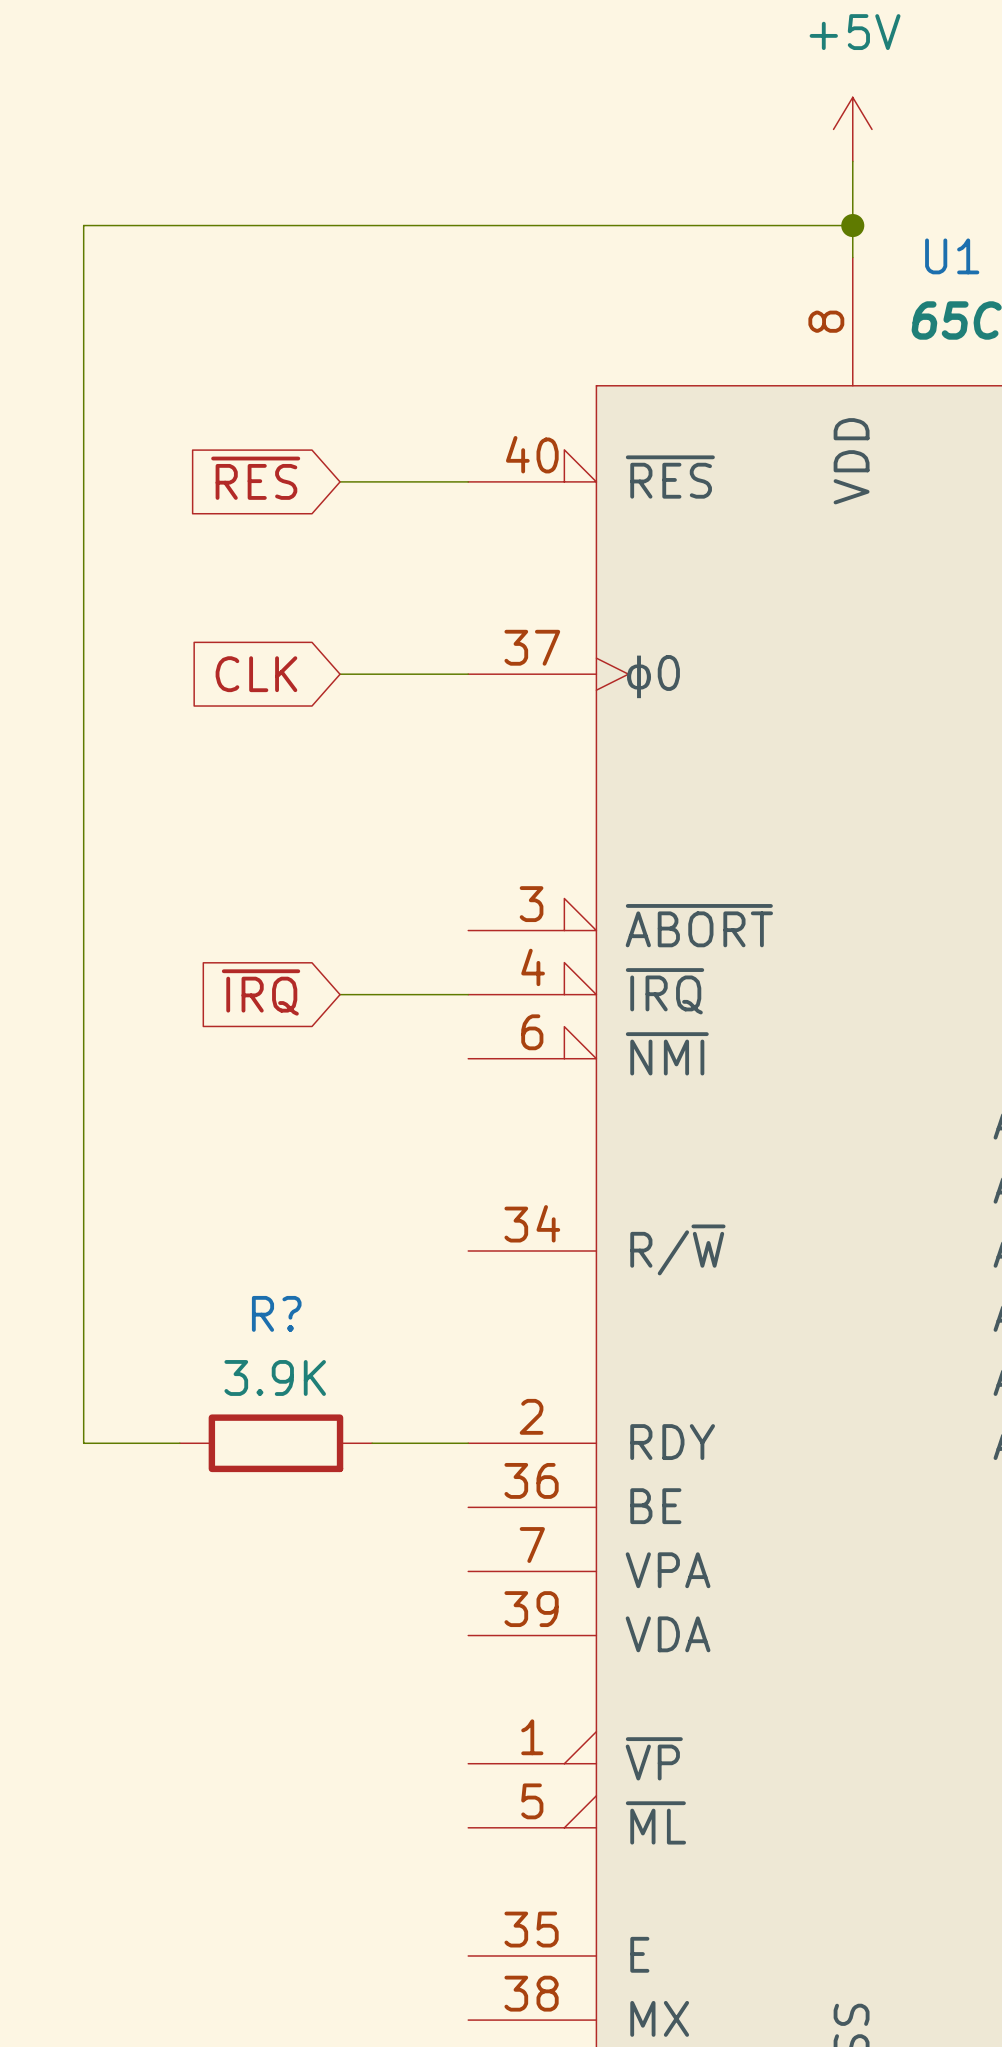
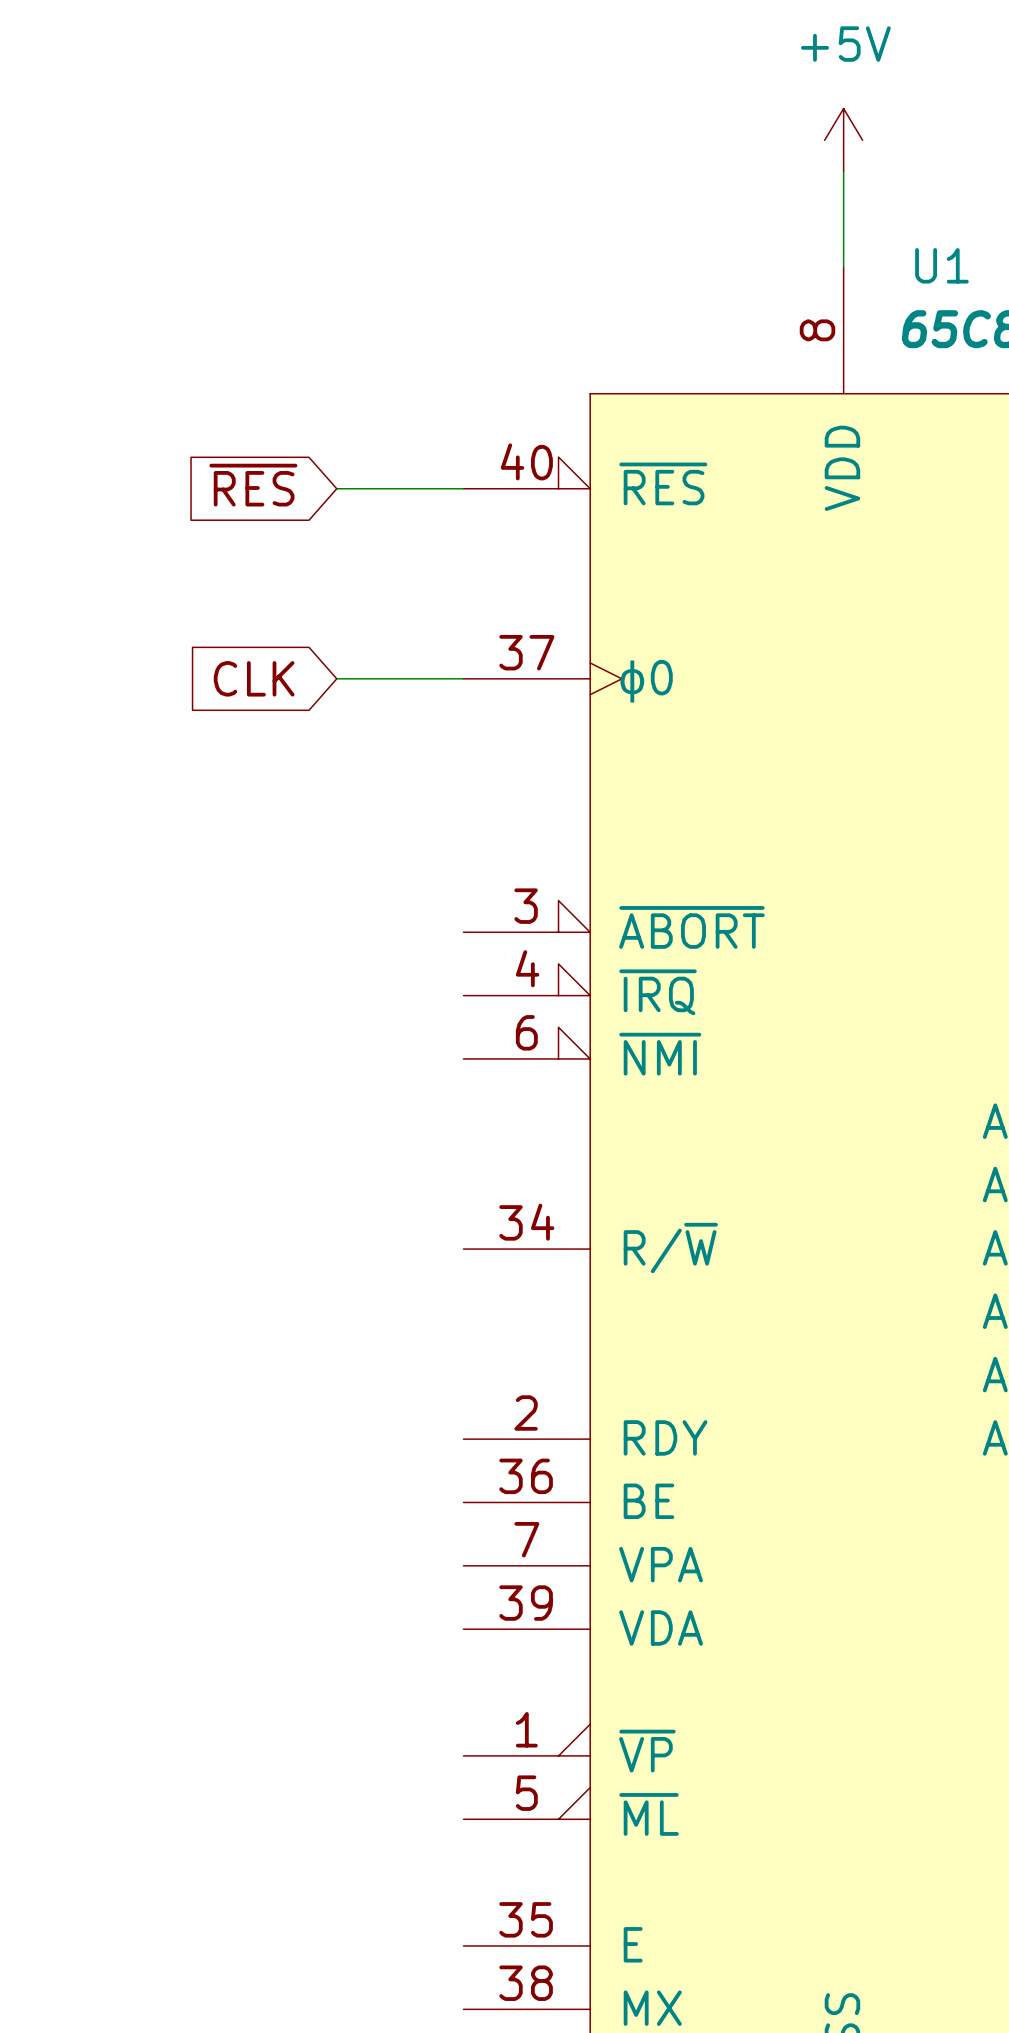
wire: (852, 225) (83, 225) (83, 1443) (179, 1443) -> none
junction: (852, 225) -> none
global label: ~{IRQ} (261, 992) -> none
wire: (340, 994) (468, 994) -> none
R?: 3.9K (275, 1443) -> none
wire: (372, 1443) (468, 1443) -> none

